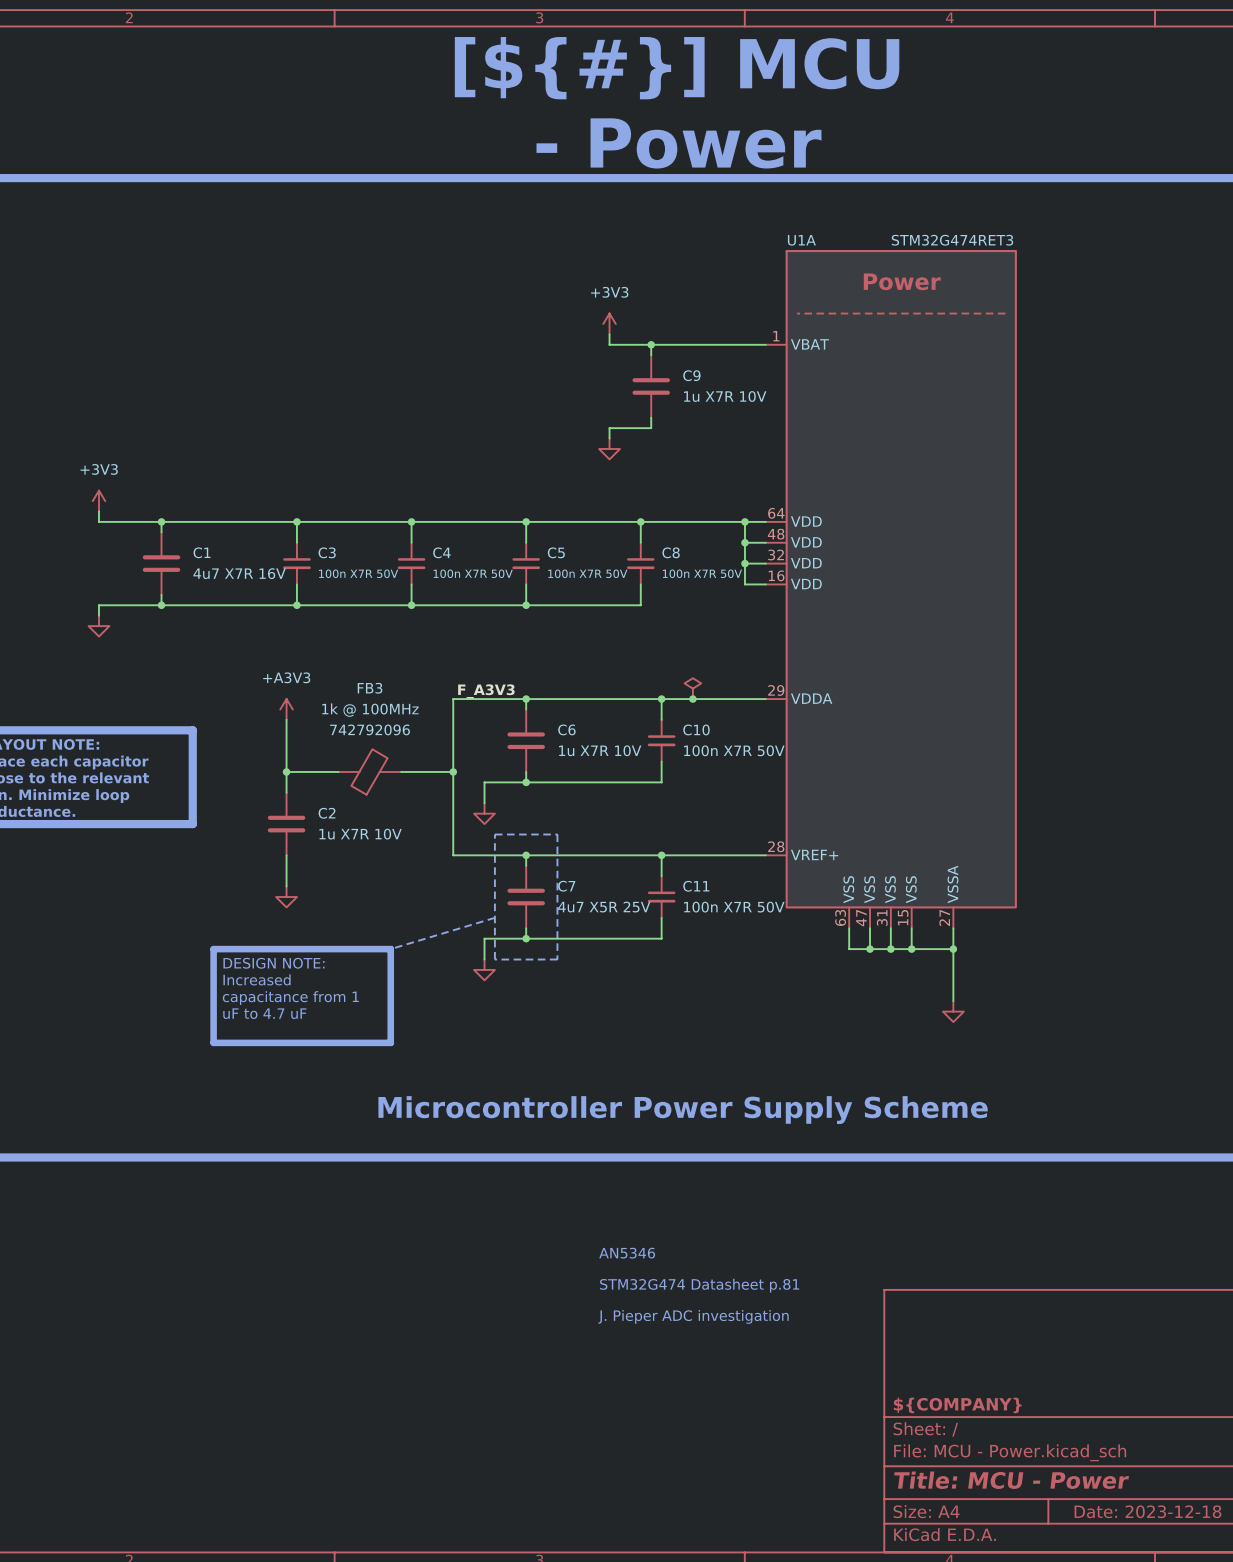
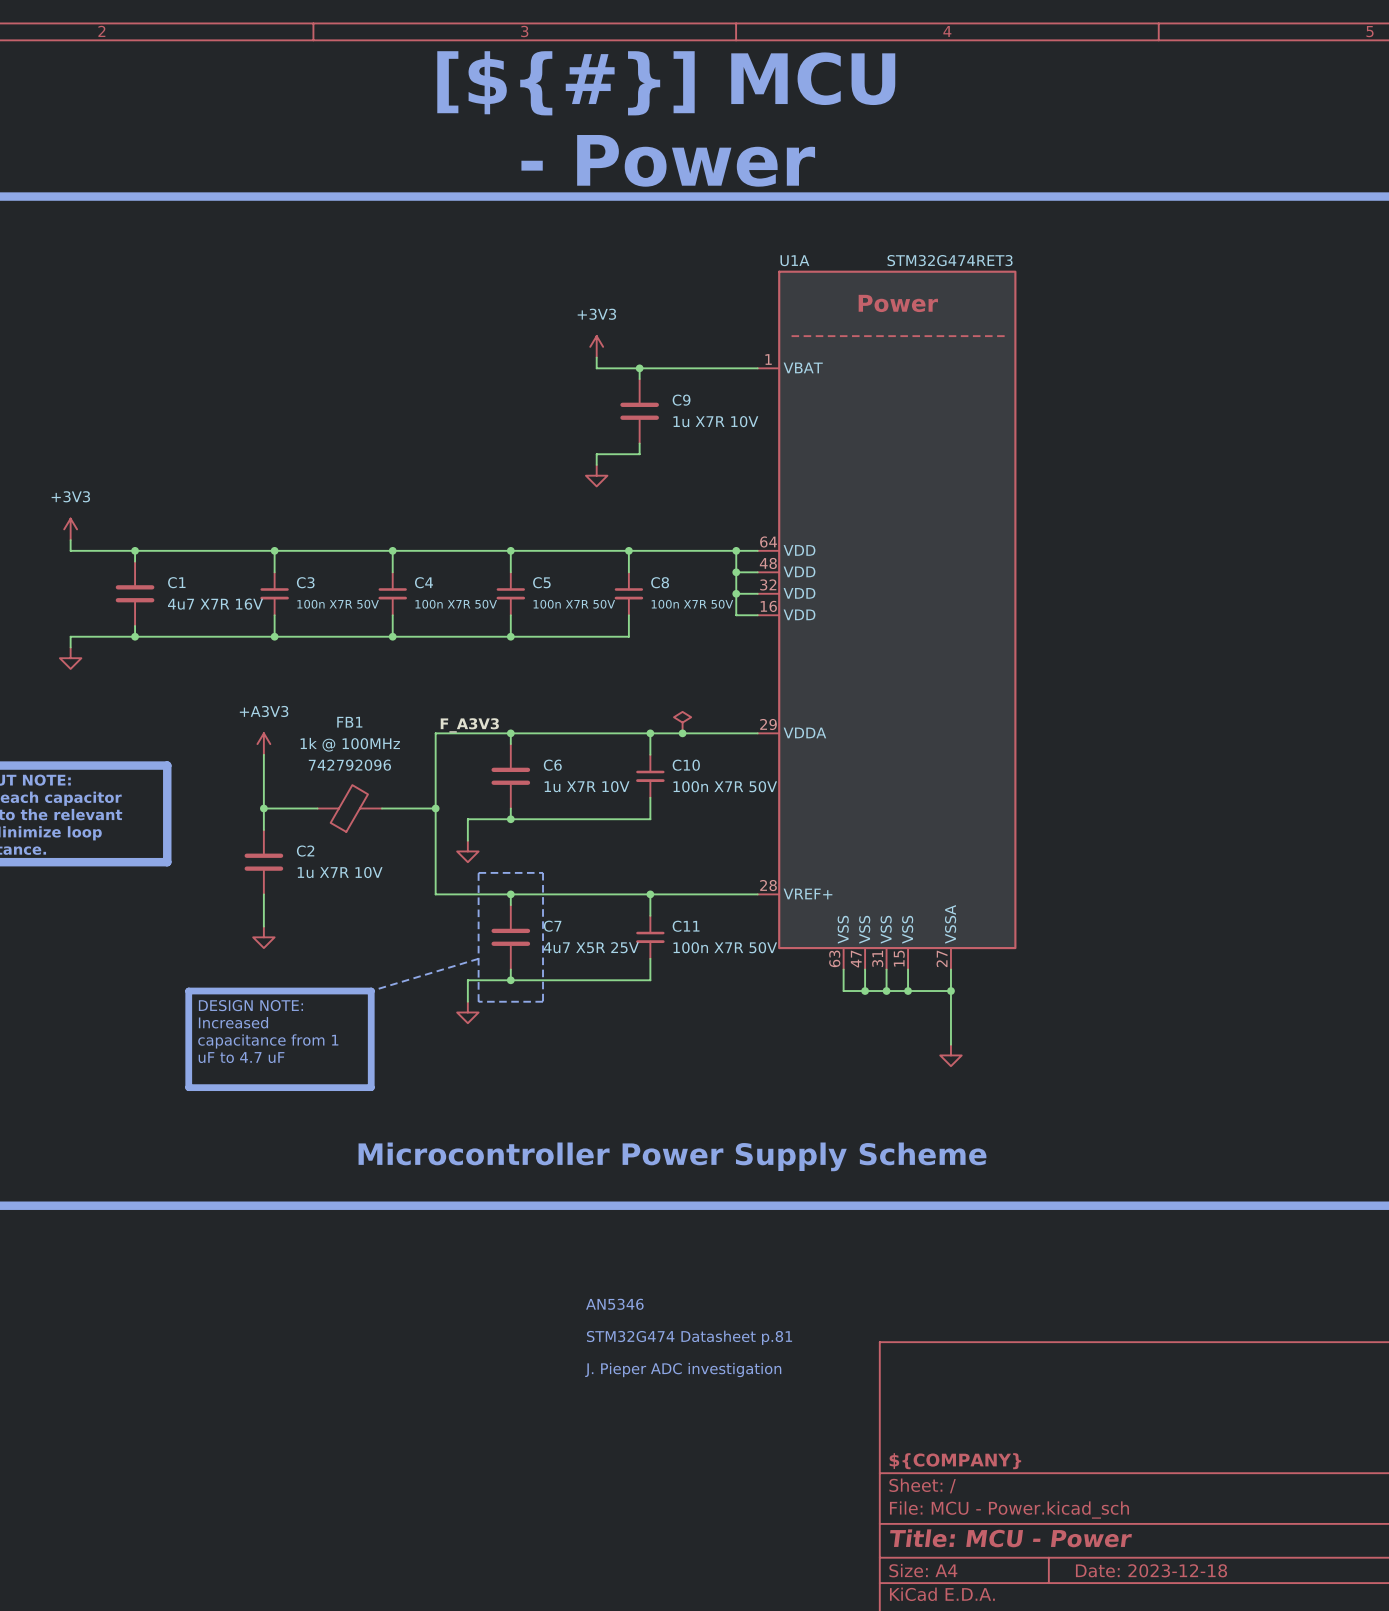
FB3 name: FB3 (370, 688) -> FB1 (349, 722)

